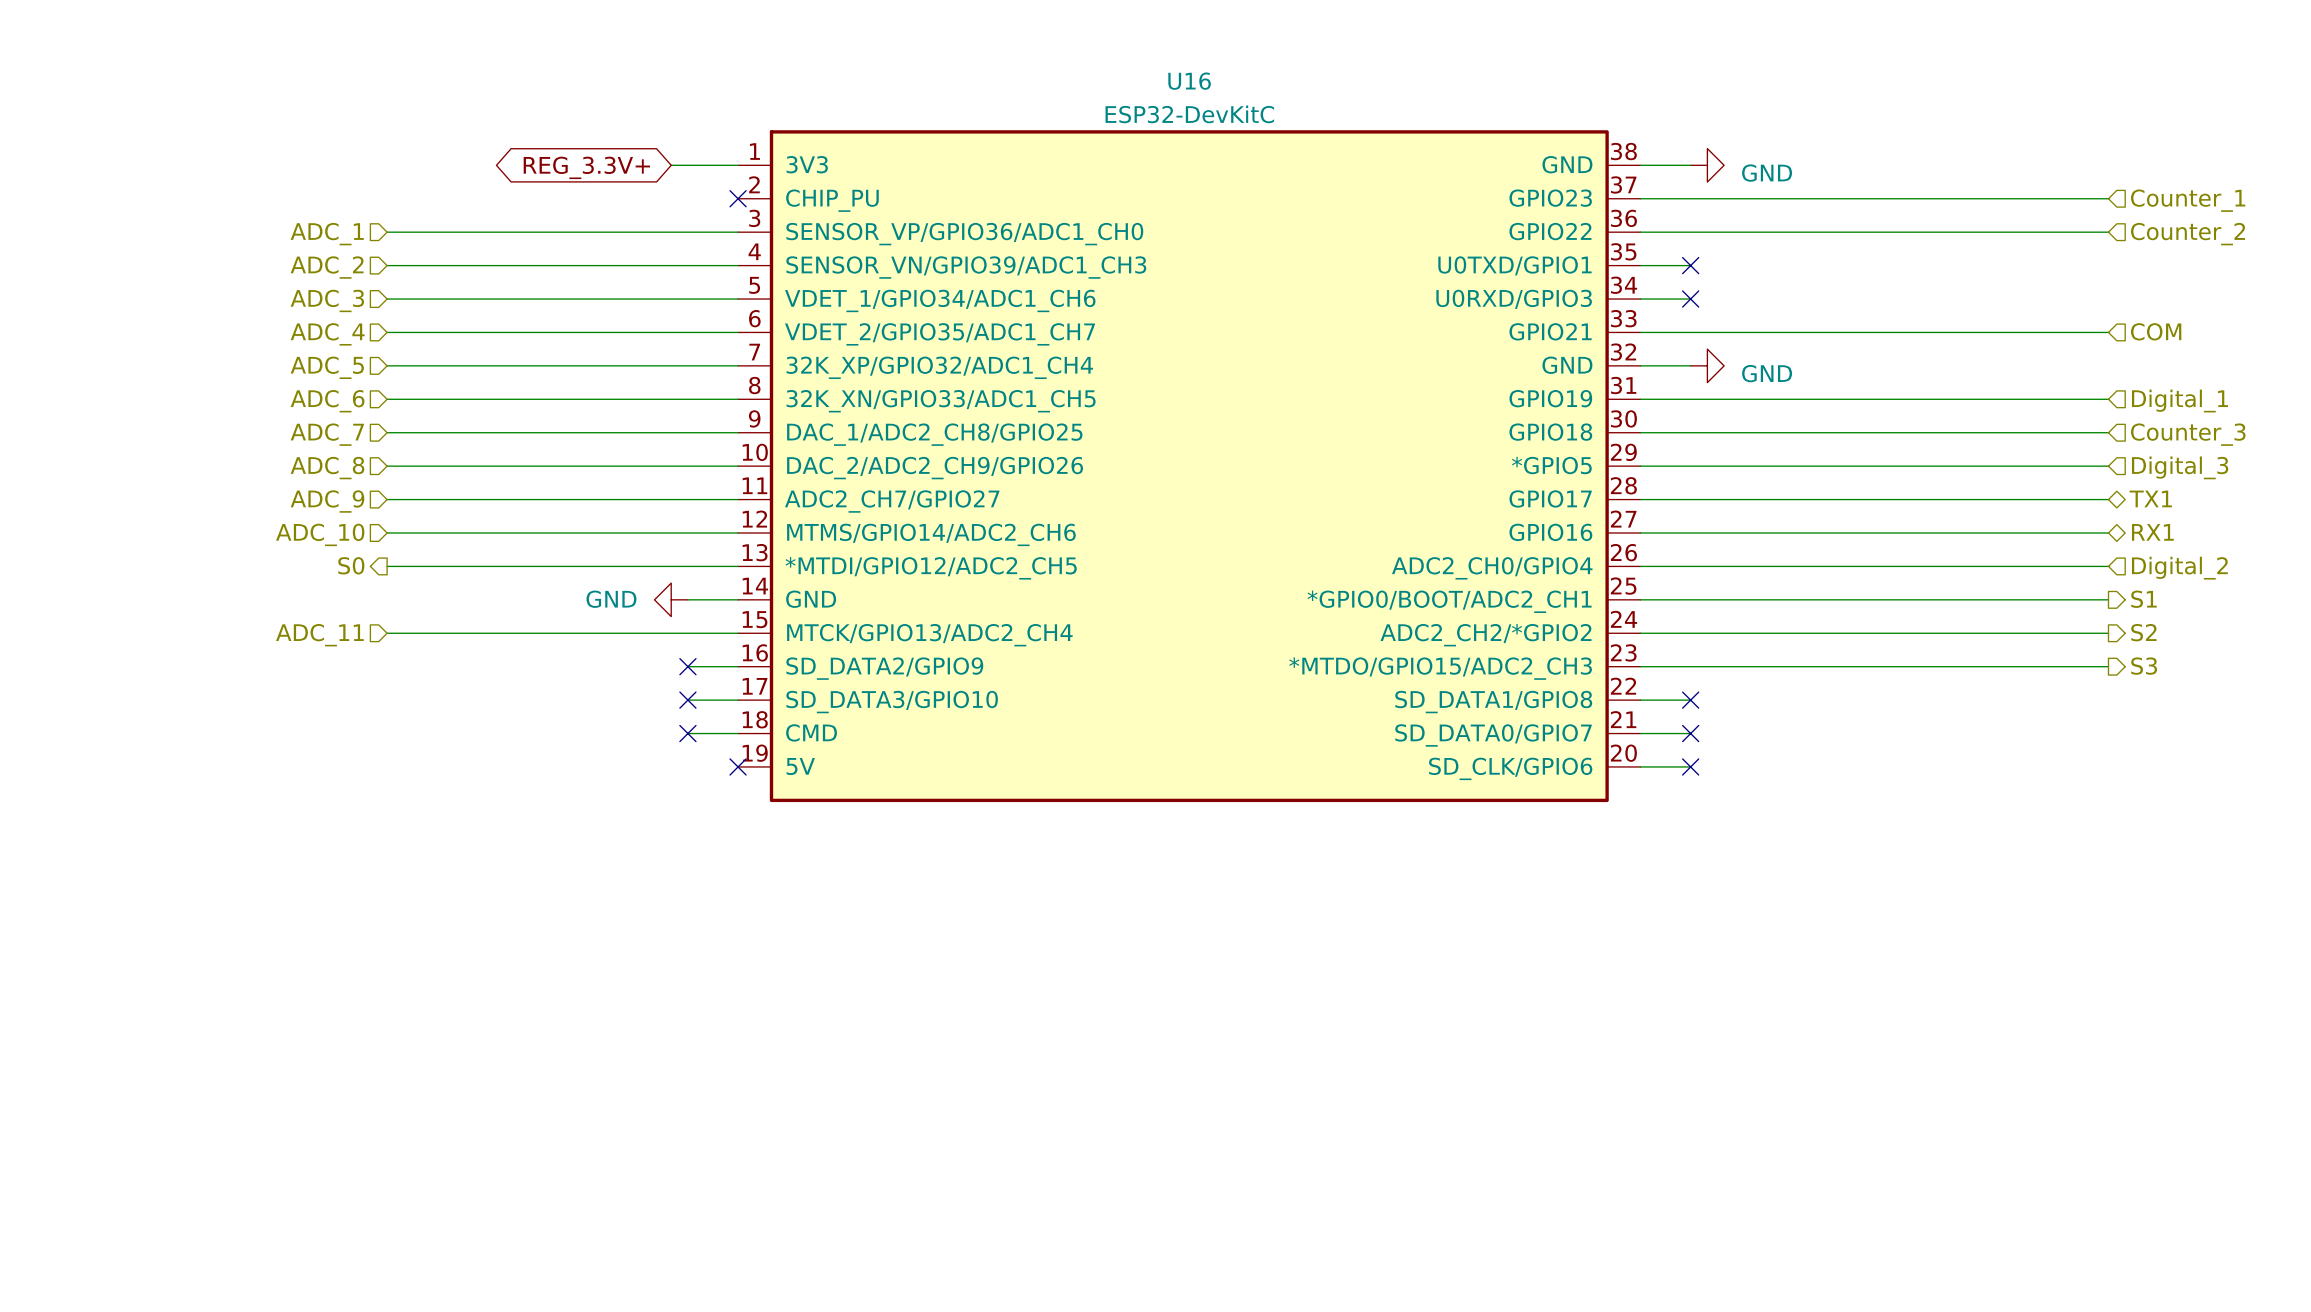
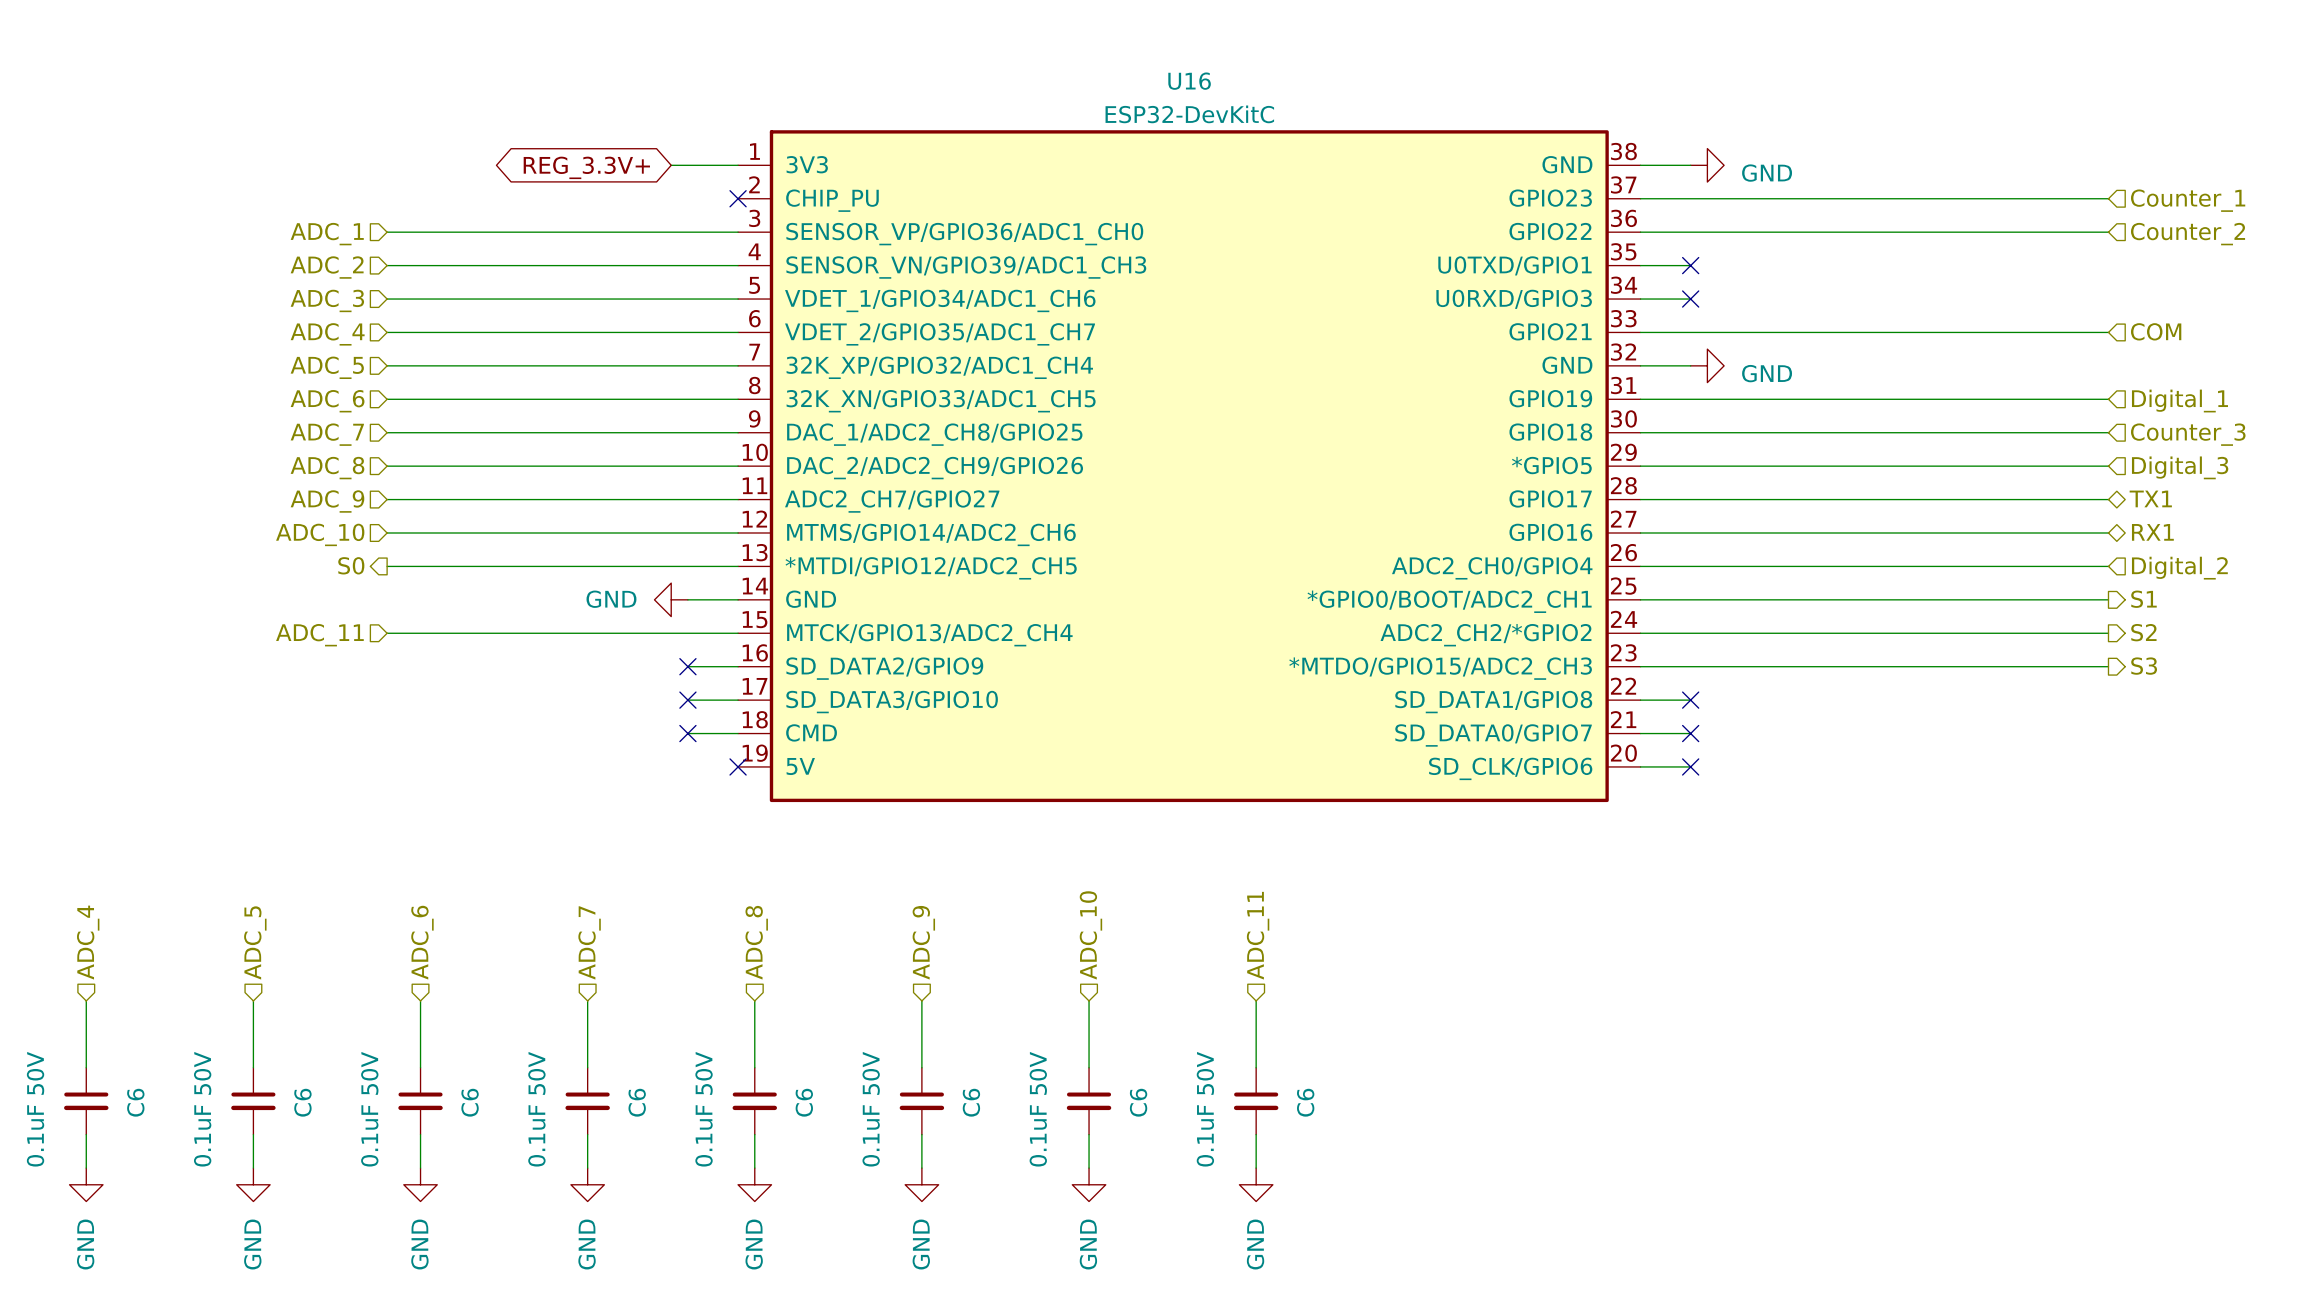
hierarchical label: none -> ADC_10 (1090, 935)
hierarchical label: none -> ADC_11 (1258, 935)
hierarchical label: none -> ADC_4 (88, 942)
hierarchical label: none -> ADC_5 (255, 942)
hierarchical label: none -> ADC_6 (422, 942)
hierarchical label: none -> ADC_7 (589, 942)
hierarchical label: none -> ADC_8 (756, 942)
hierarchical label: none -> ADC_9 (923, 942)
wire: none -> (86, 1000) (86, 1067)
wire: none -> (253, 1000) (253, 1067)
wire: none -> (420, 1000) (420, 1067)
wire: none -> (587, 1000) (587, 1067)
wire: none -> (754, 1000) (754, 1067)
wire: none -> (921, 1000) (921, 1067)
wire: none -> (1089, 1000) (1089, 1067)
wire: none -> (1256, 1000) (1256, 1067)
C6: none -> 0.1uF 50V (86, 1101)
C6: none -> 0.1uF 50V (253, 1101)
C6: none -> 0.1uF 50V (420, 1101)
C6: none -> 0.1uF 50V (587, 1101)
C6: none -> 0.1uF 50V (754, 1101)
C6: none -> 0.1uF 50V (921, 1101)
C6: none -> 0.1uF 50V (1089, 1101)
C6: none -> 0.1uF 50V (1256, 1101)
wire: none -> (86, 1134) (86, 1168)
wire: none -> (253, 1134) (253, 1168)
wire: none -> (420, 1134) (420, 1168)
wire: none -> (587, 1134) (587, 1168)
wire: none -> (754, 1134) (754, 1168)
wire: none -> (921, 1134) (921, 1168)
wire: none -> (1089, 1134) (1089, 1168)
wire: none -> (1256, 1134) (1256, 1168)
power symbol: none -> GND (86, 1184)
power symbol: none -> GND (253, 1184)
power symbol: none -> GND (420, 1184)
power symbol: none -> GND (587, 1184)
power symbol: none -> GND (754, 1184)
power symbol: none -> GND (921, 1184)
power symbol: none -> GND (1089, 1184)
power symbol: none -> GND (1256, 1184)

